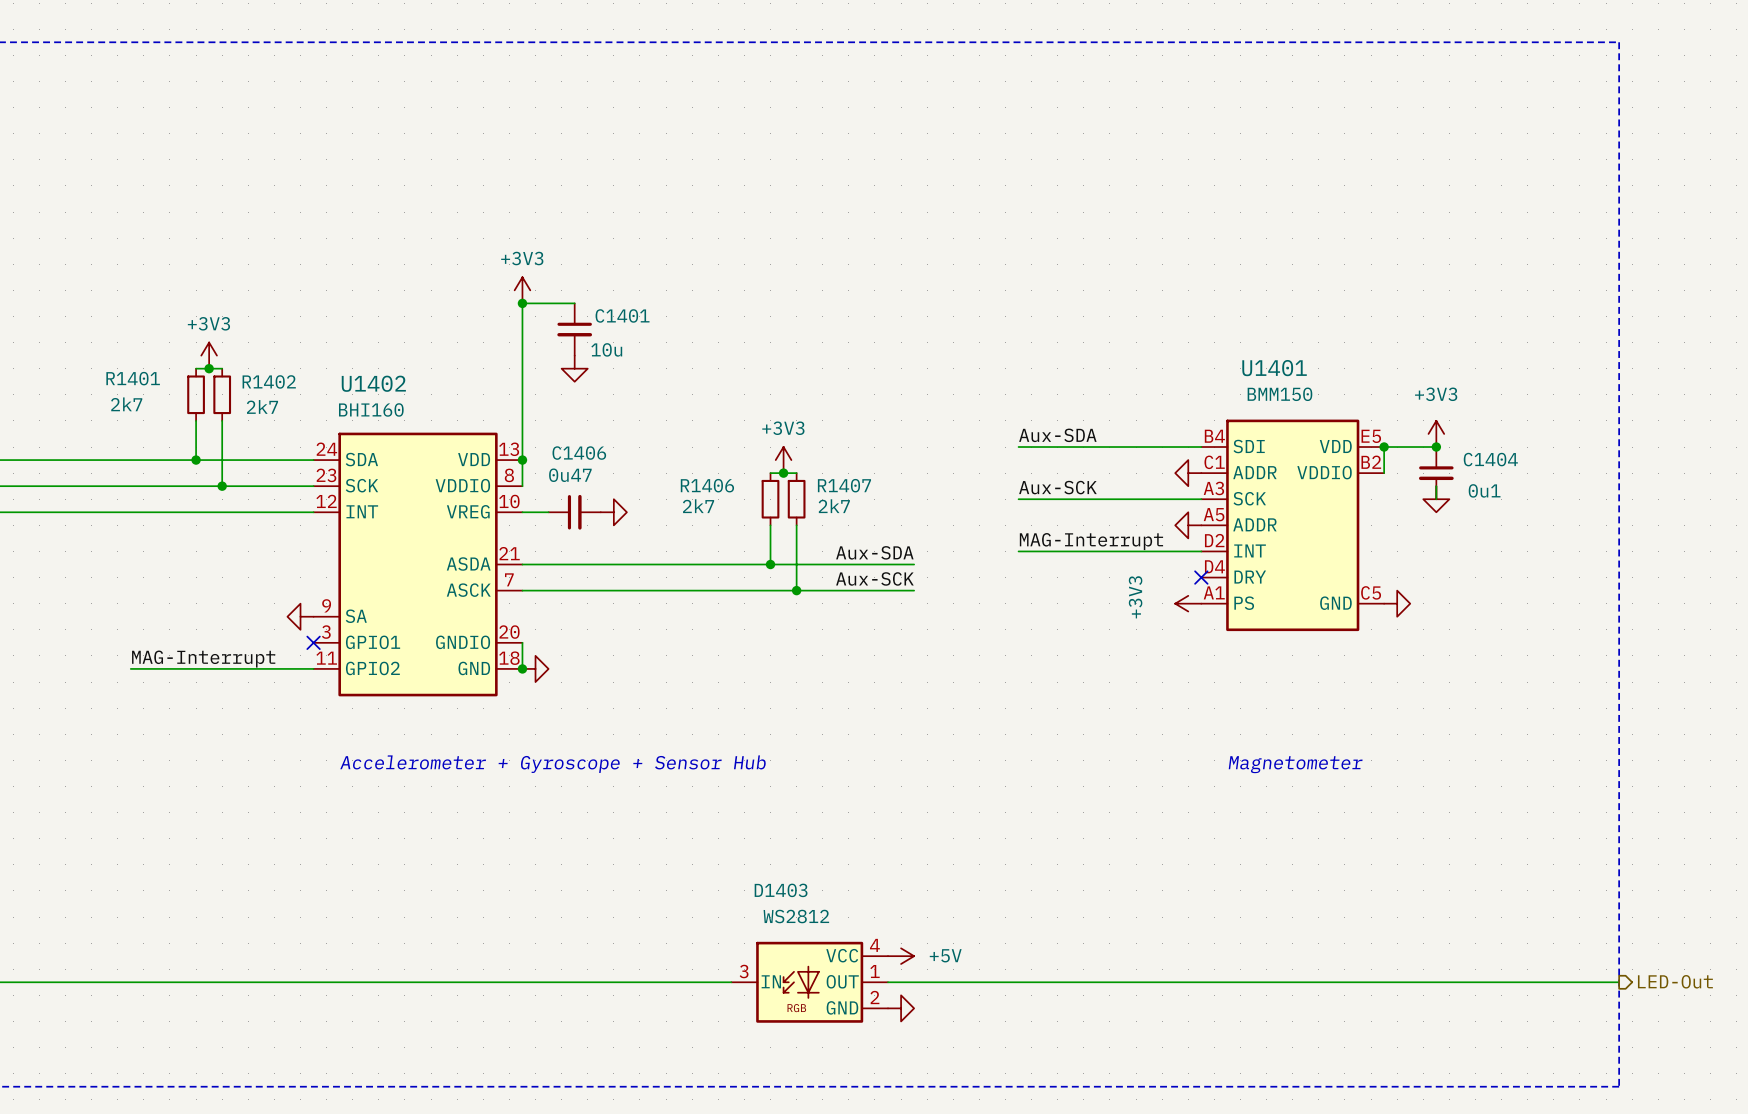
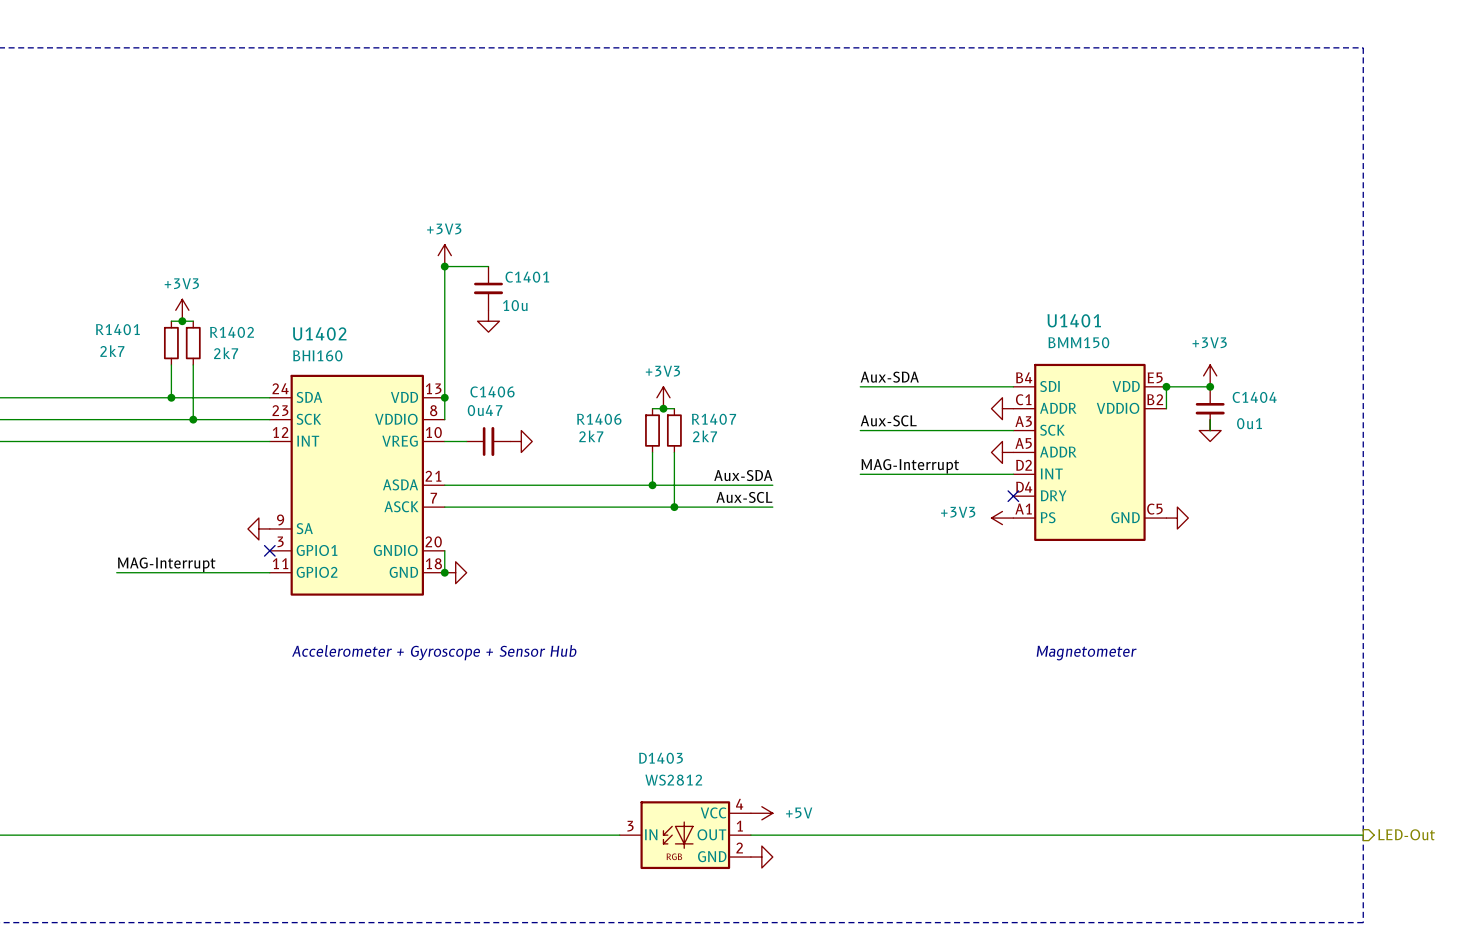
label: Aux-SCK (1057, 487) -> Aux-SCL (888, 420)
label: Aux-SCK (874, 578) -> Aux-SCL (744, 497)
power symbol text rotation: 0° (1135, 597) -> 90° clockwise (958, 512)

